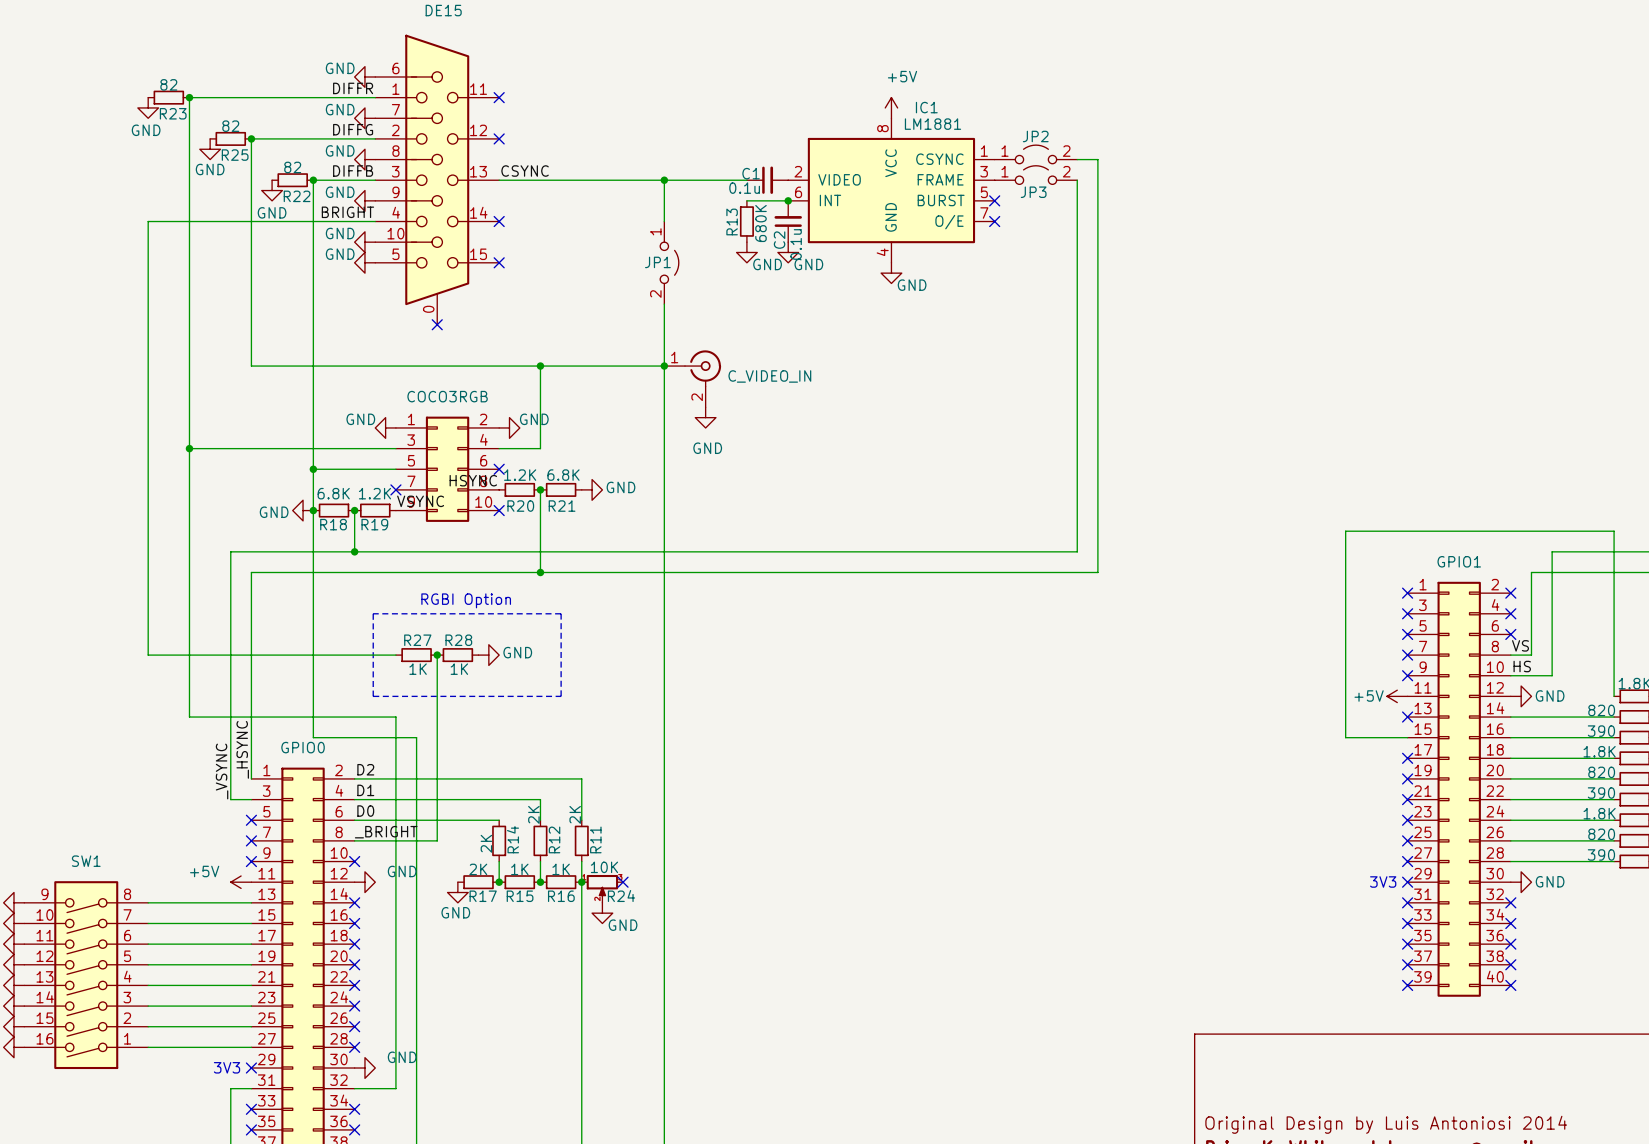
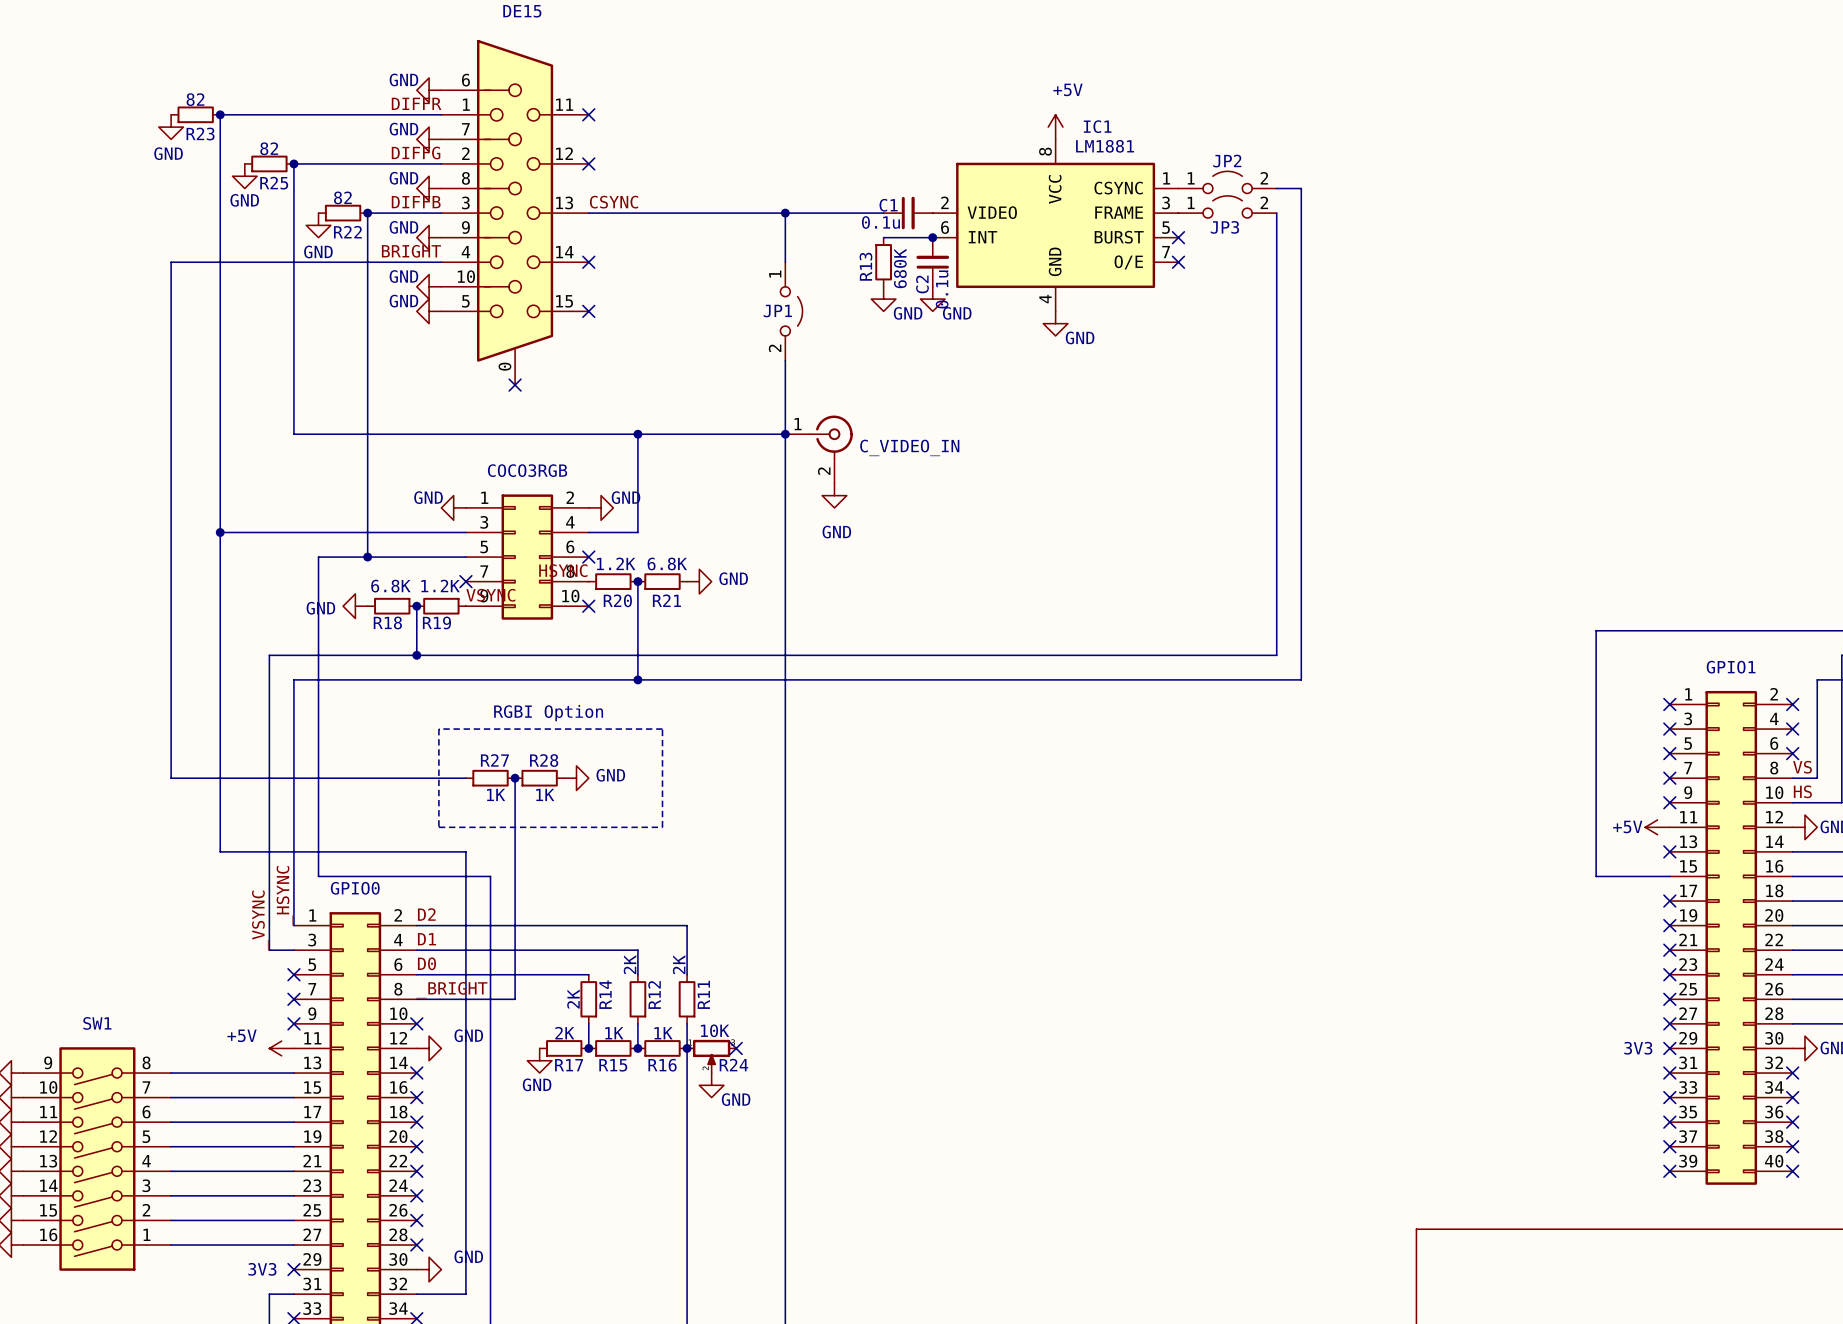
wire: (313, 469) (313, 737) -> (367, 557) (318, 557) (318, 876) (367, 876)
junction: (313, 510) -> none

